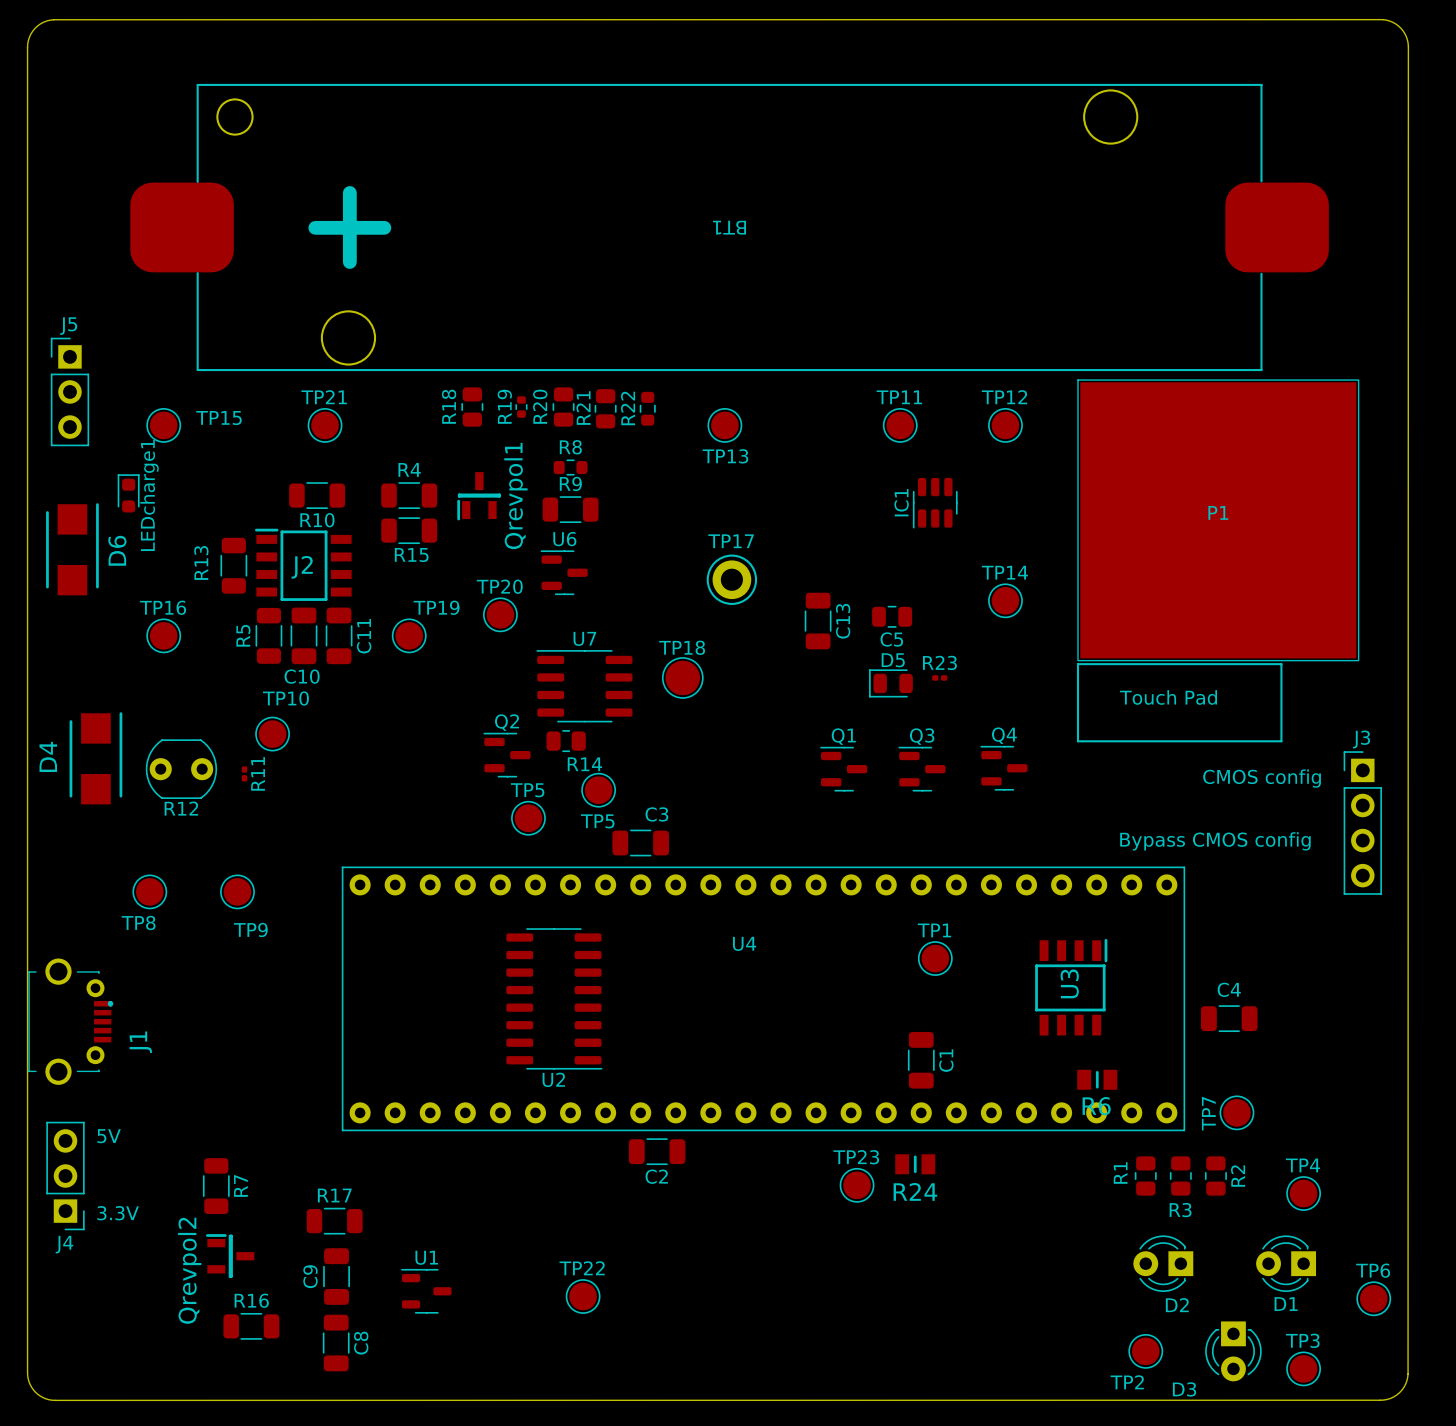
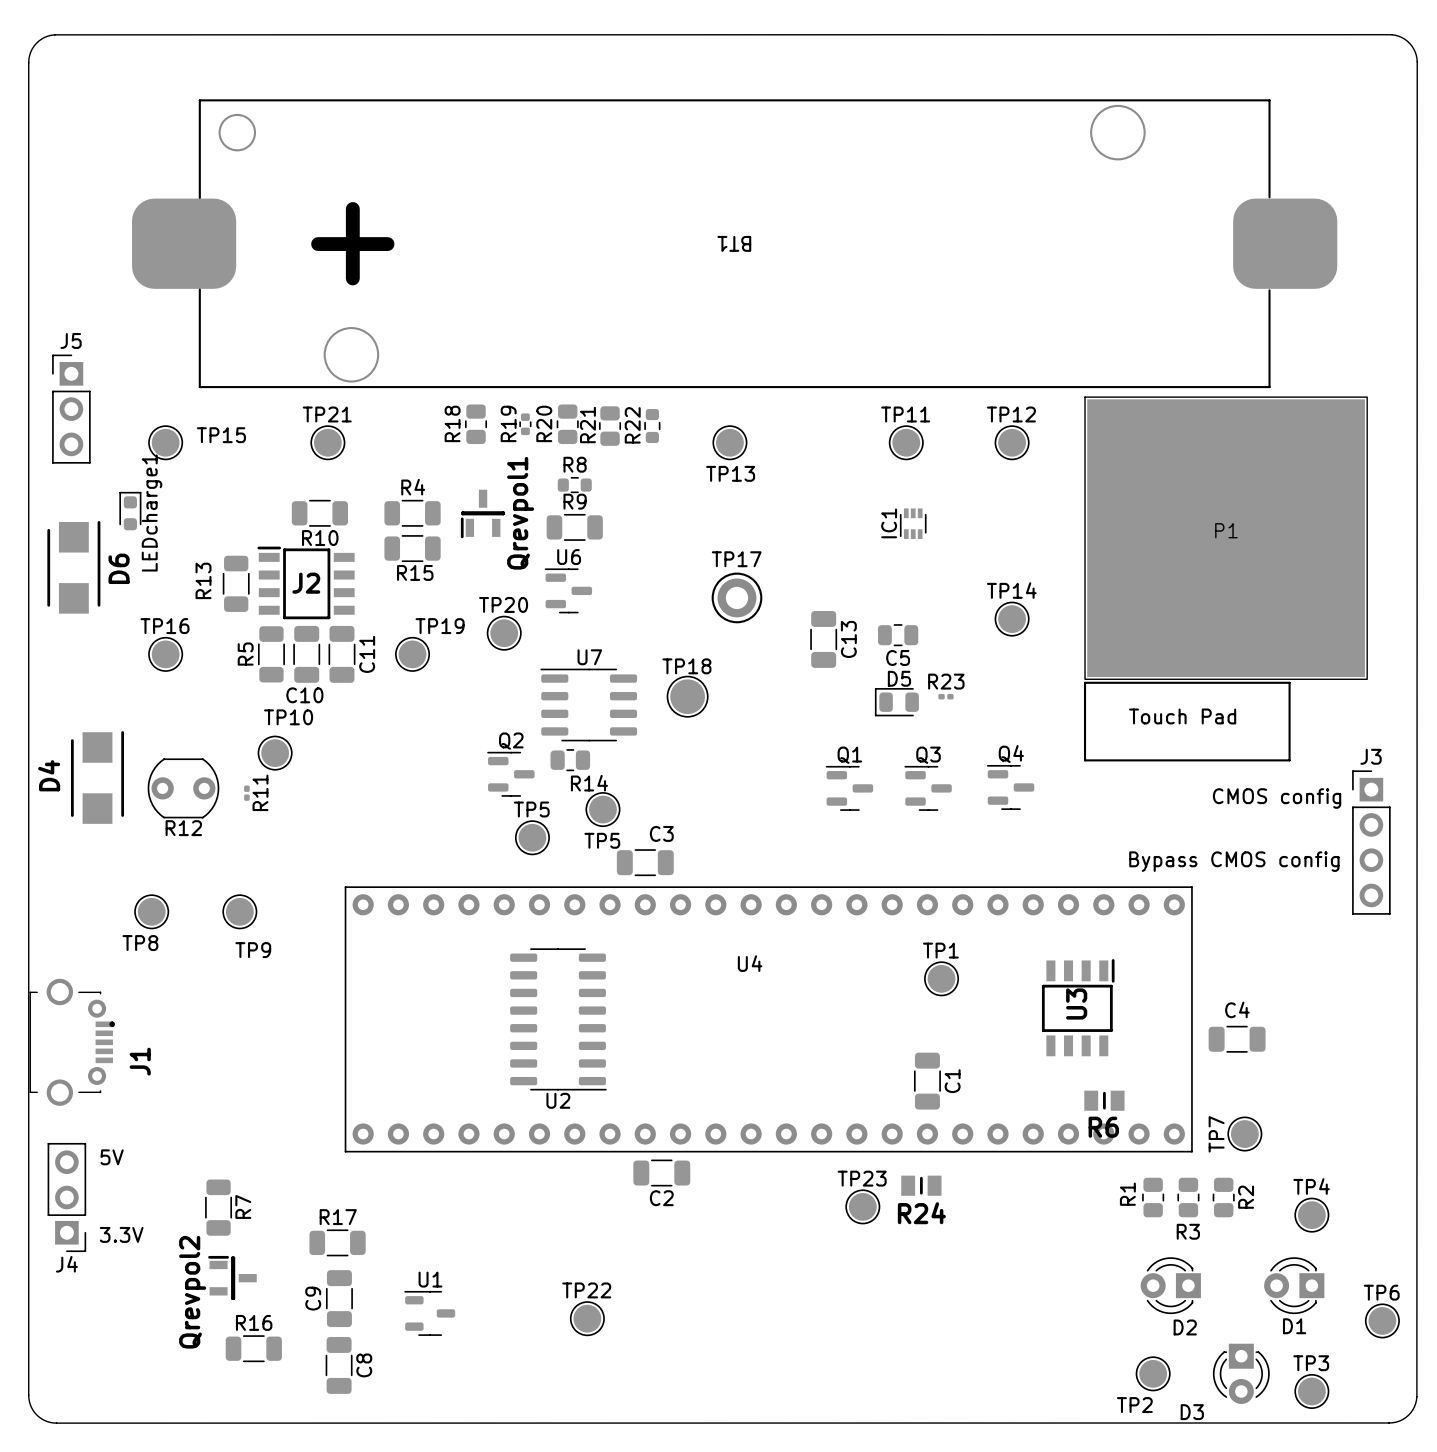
IC1 footprint: [912, 477, 958, 529] -> [899, 508, 927, 539]

